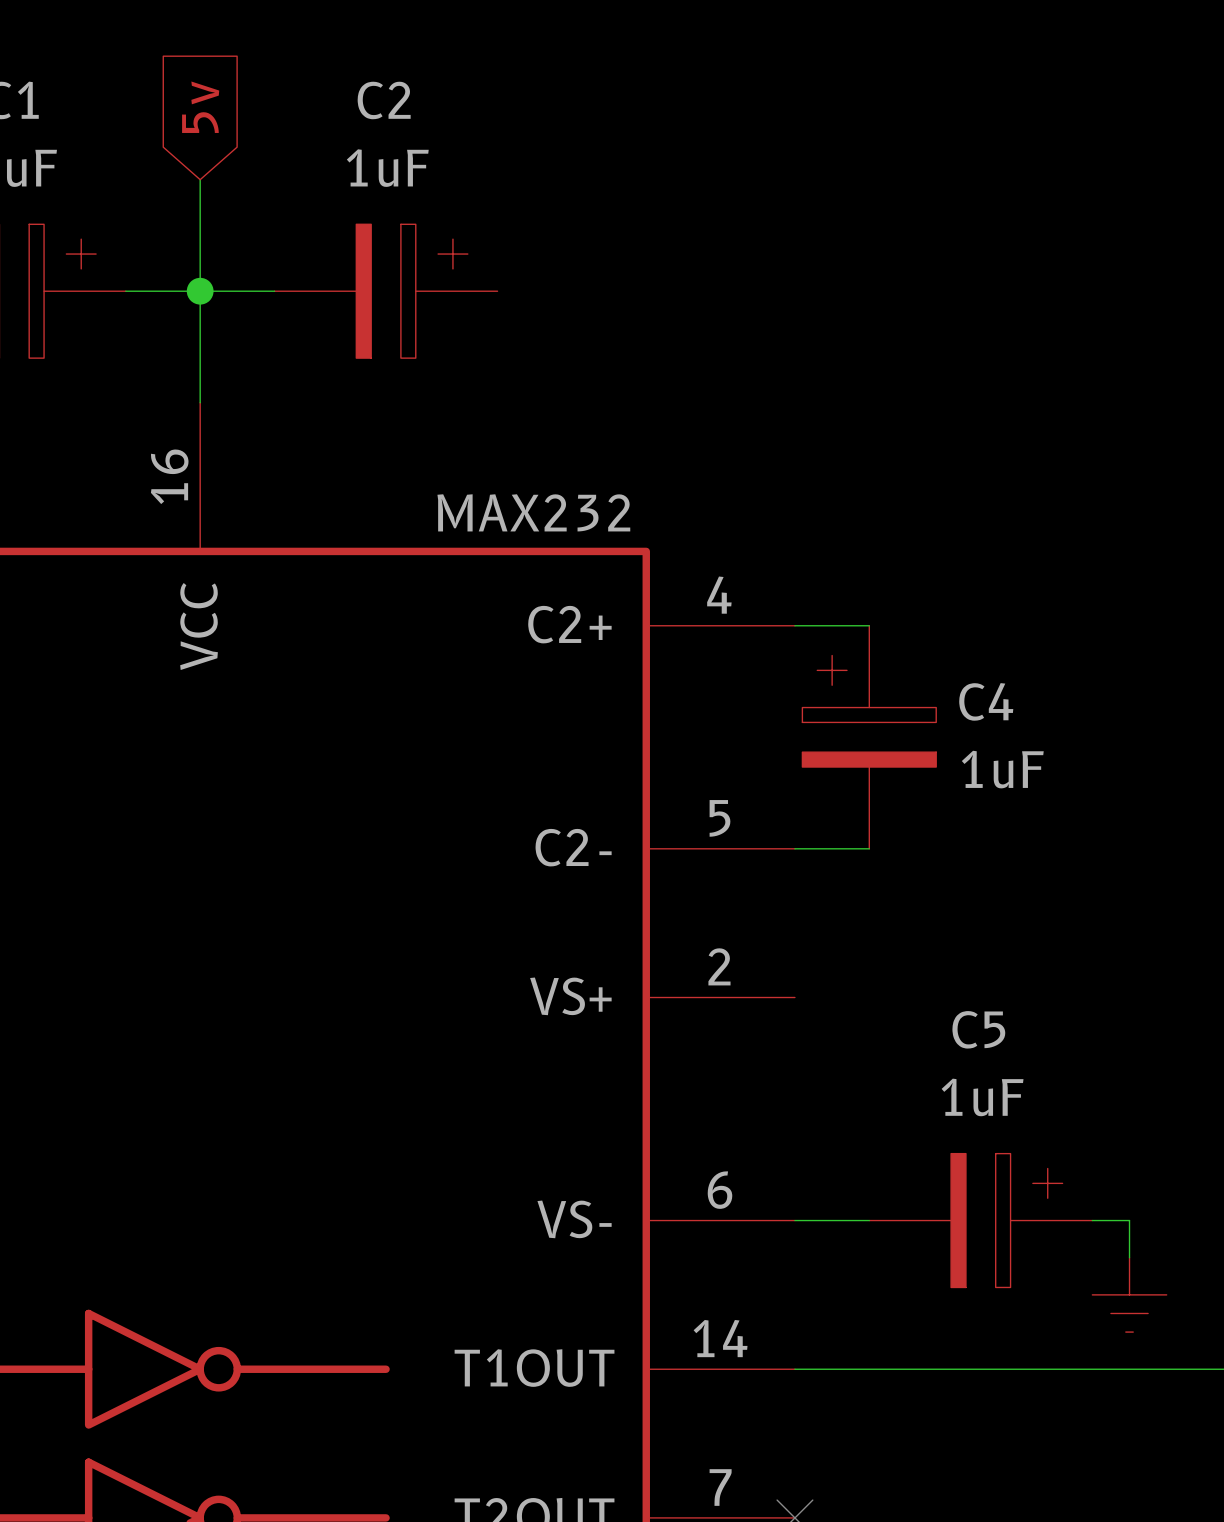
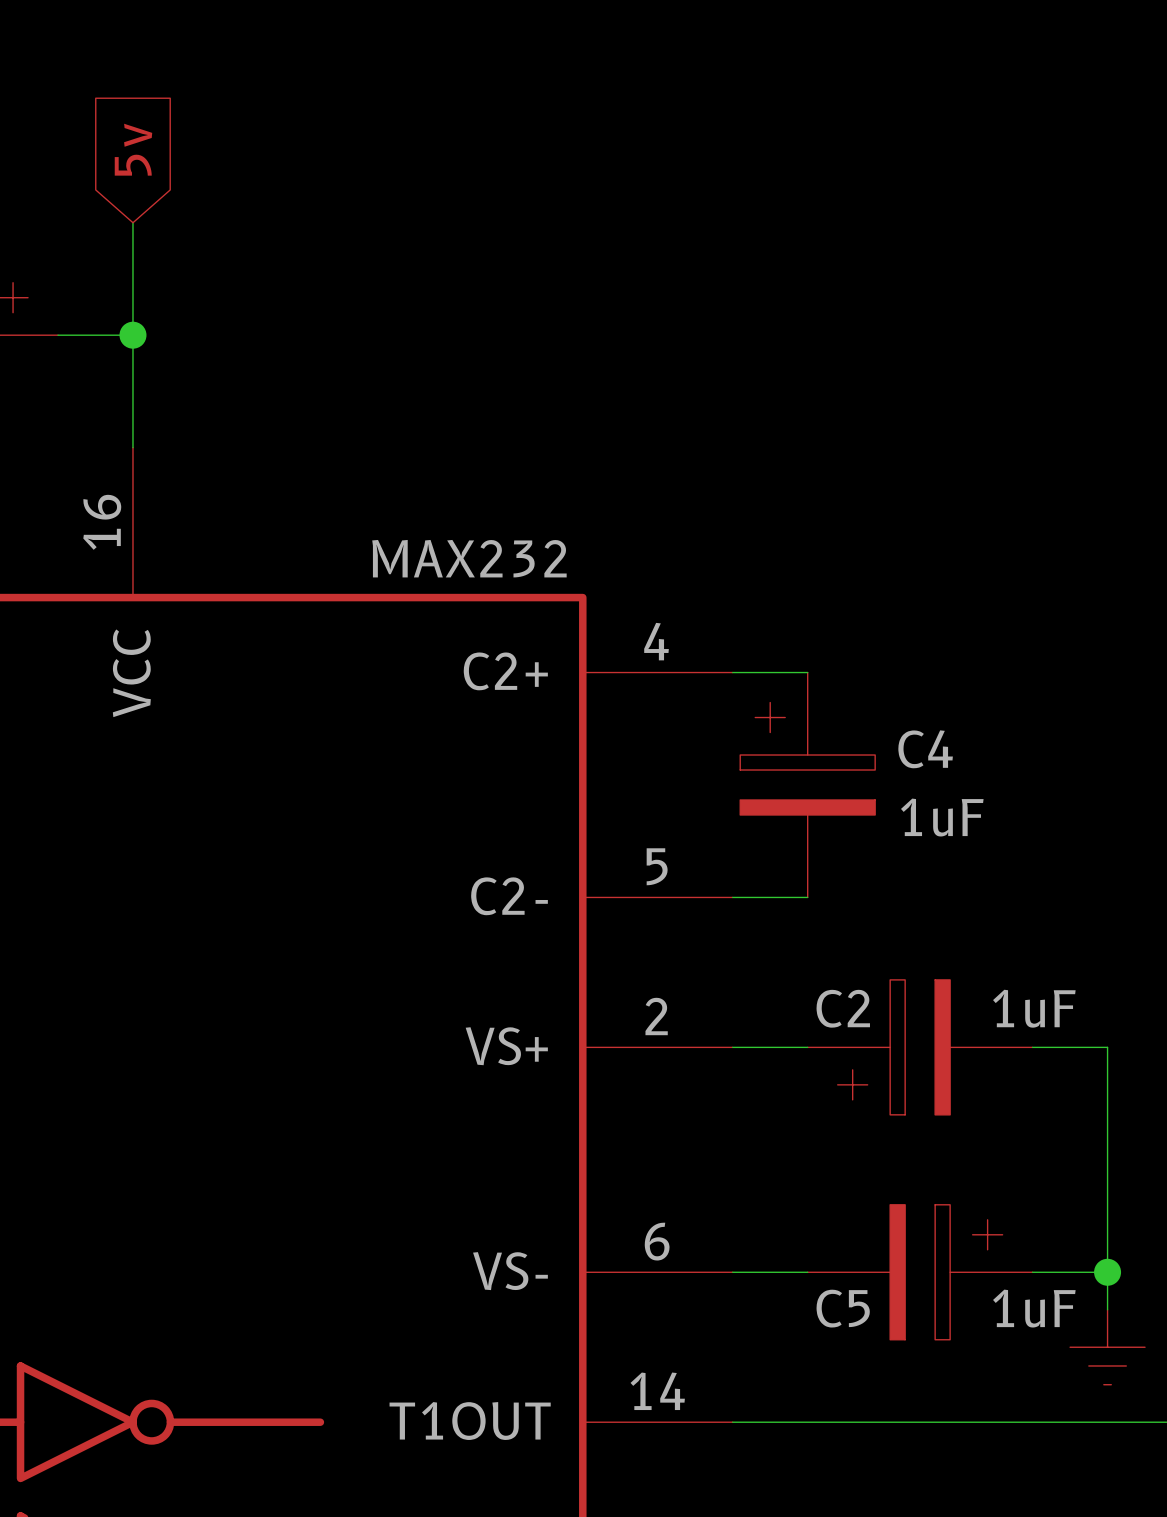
C2 name position: C2 (384, 100) -> C2 (843, 1008)
C2 value position: 1uF (387, 168) -> 1uF (1034, 1008)
wire: (200, 291) (274, 291) -> none
C2 position: (386, 291) -> (920, 1047)
C2 rotation: 0° (412, 291) -> 180° (893, 1047)
wire: none -> (732, 1047) (807, 1047)
wire: none -> (1032, 1047) (1107, 1047) (1107, 1309)
C5 name position: C5 (978, 1029) -> C5 (843, 1308)
C5 value position: 1uF (982, 1097) -> 1uF (1034, 1308)
wire: (1129, 1220) (1129, 1257) -> (1070, 1272) (1107, 1272)
junction: none -> (1107, 1272)
power symbol position: (1129, 1294) -> (1107, 1347)

